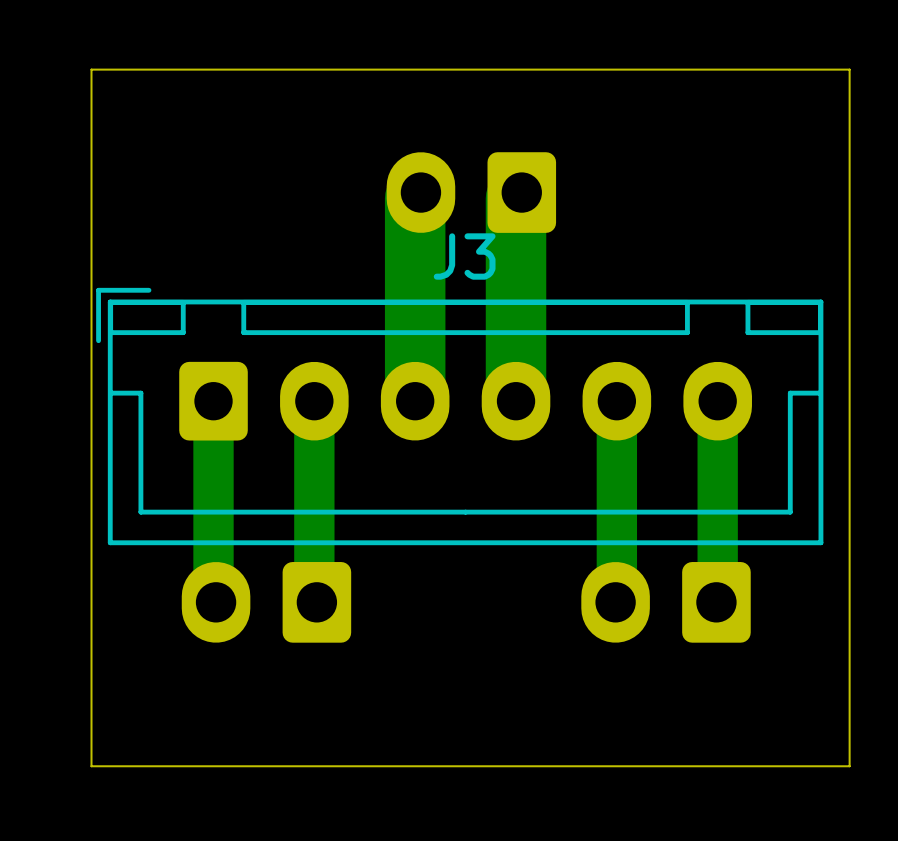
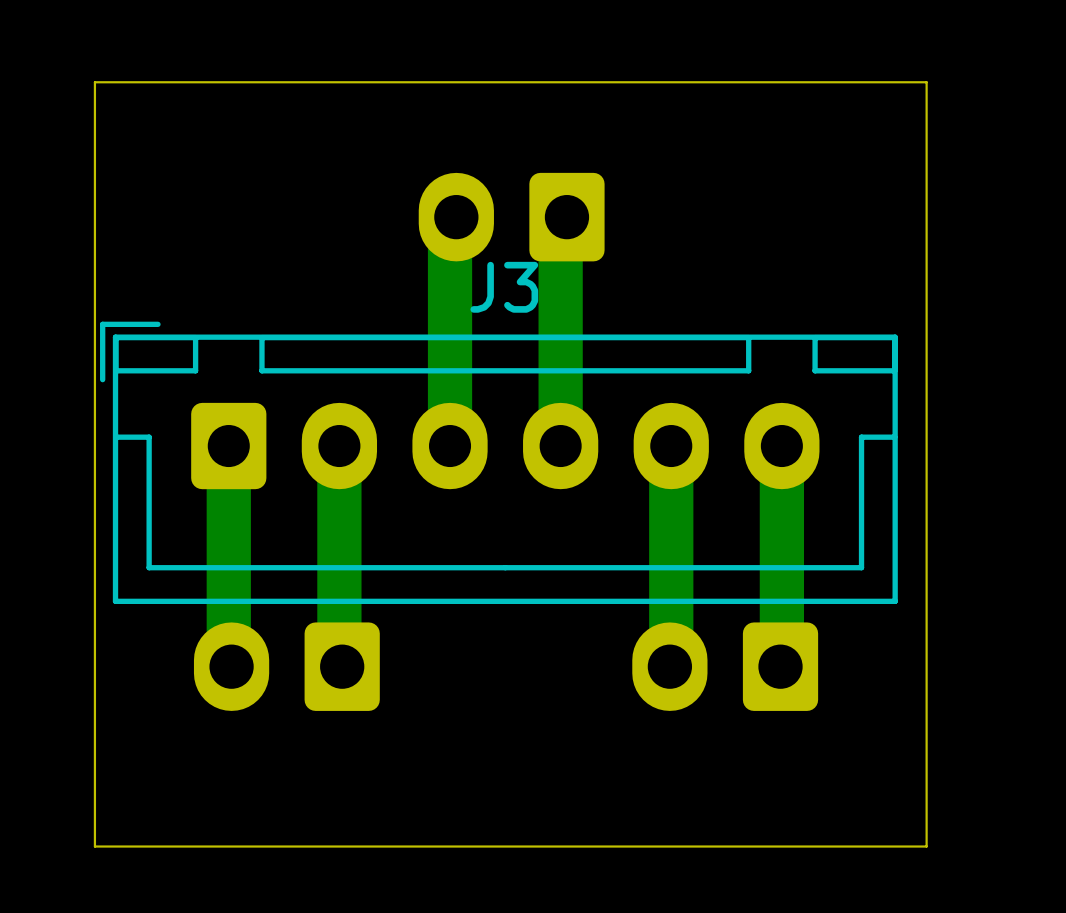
bottom track width: thick (415, 198) (415, 401) -> thin (450, 223) (450, 446)
bottom track width: thick (516, 198) (516, 401) -> thin (560, 223) (560, 446)

